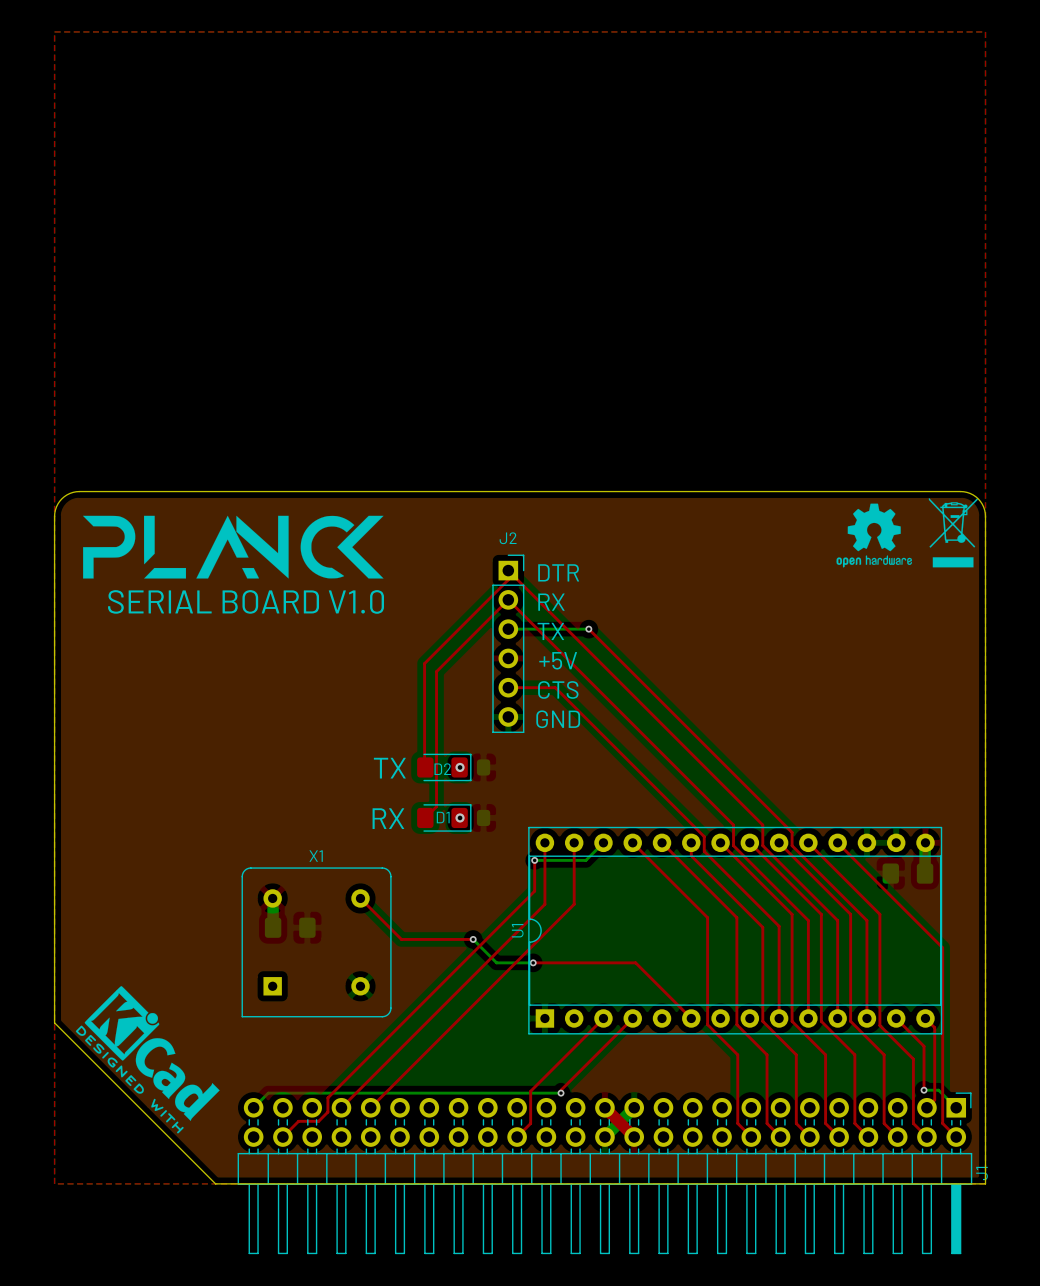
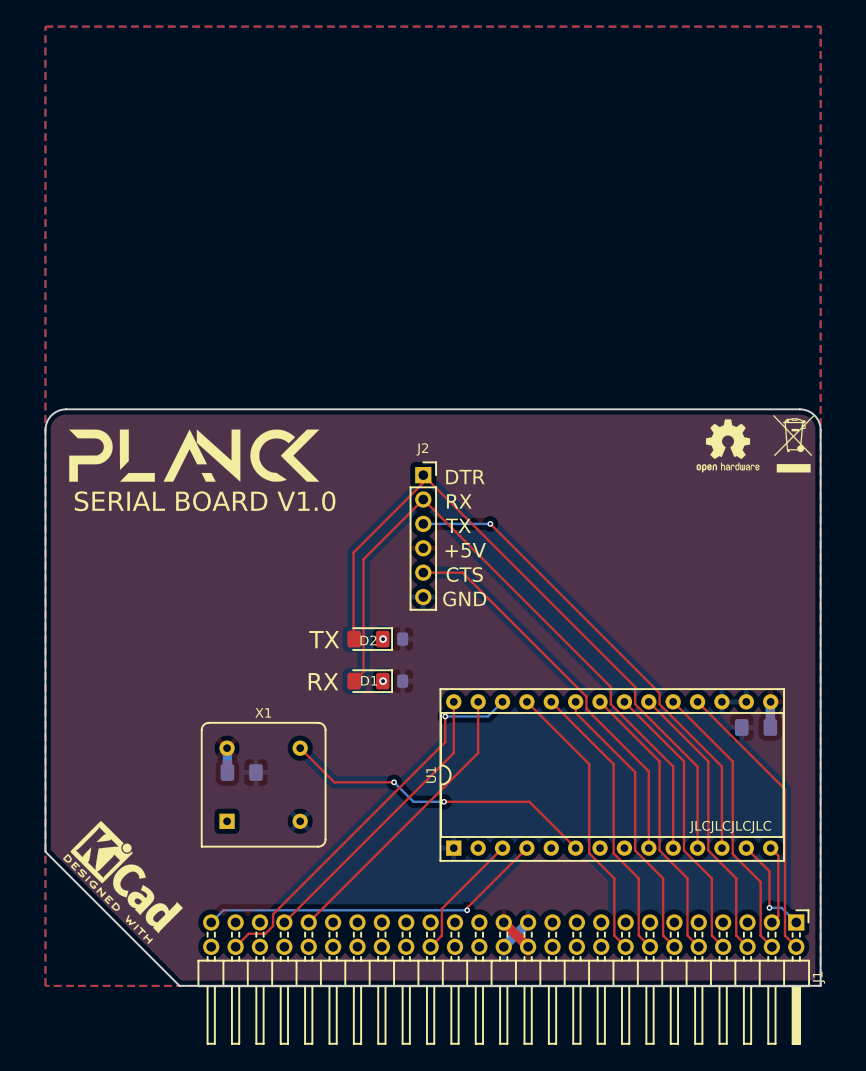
text: none -> JLCJLCJLCJLC (730, 827)

